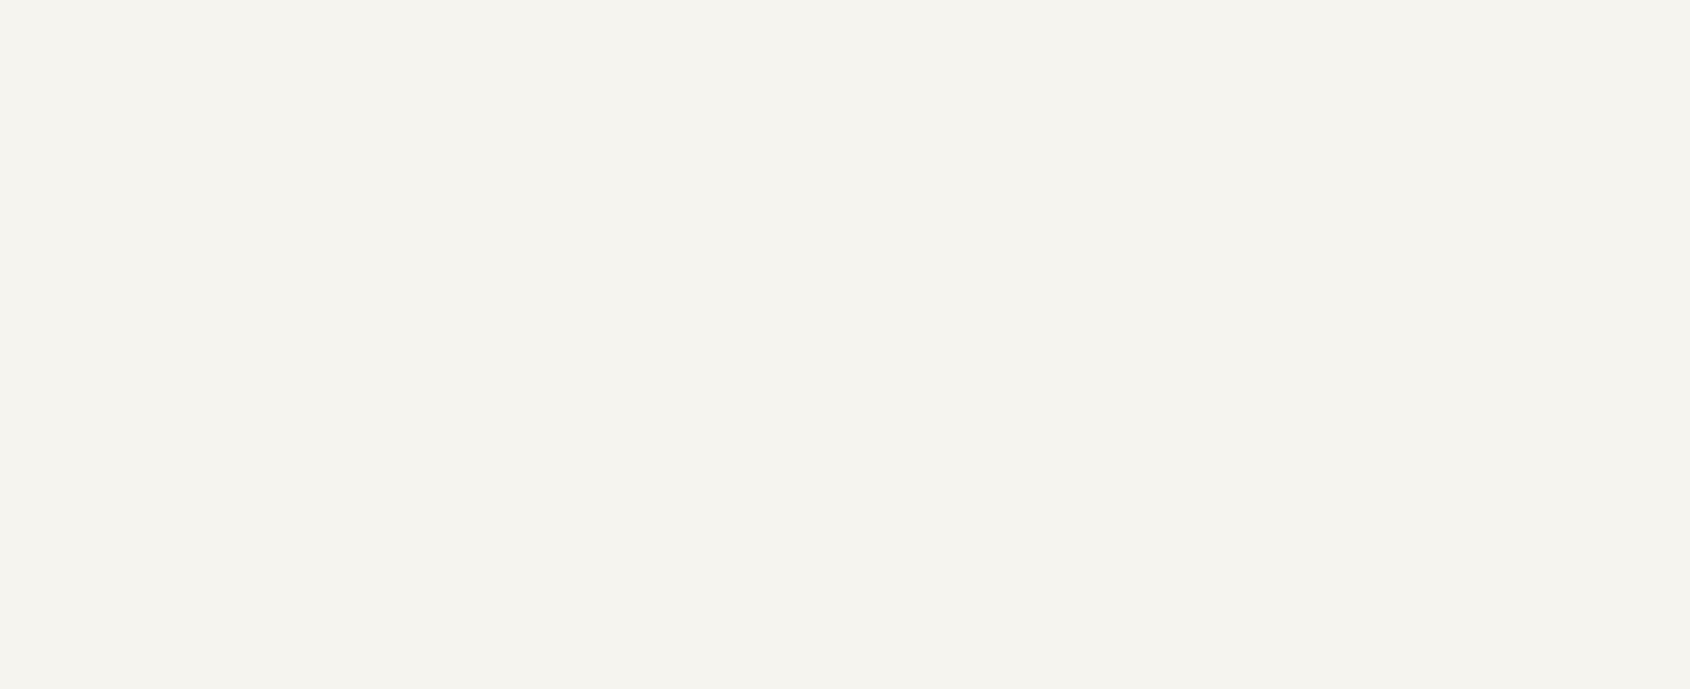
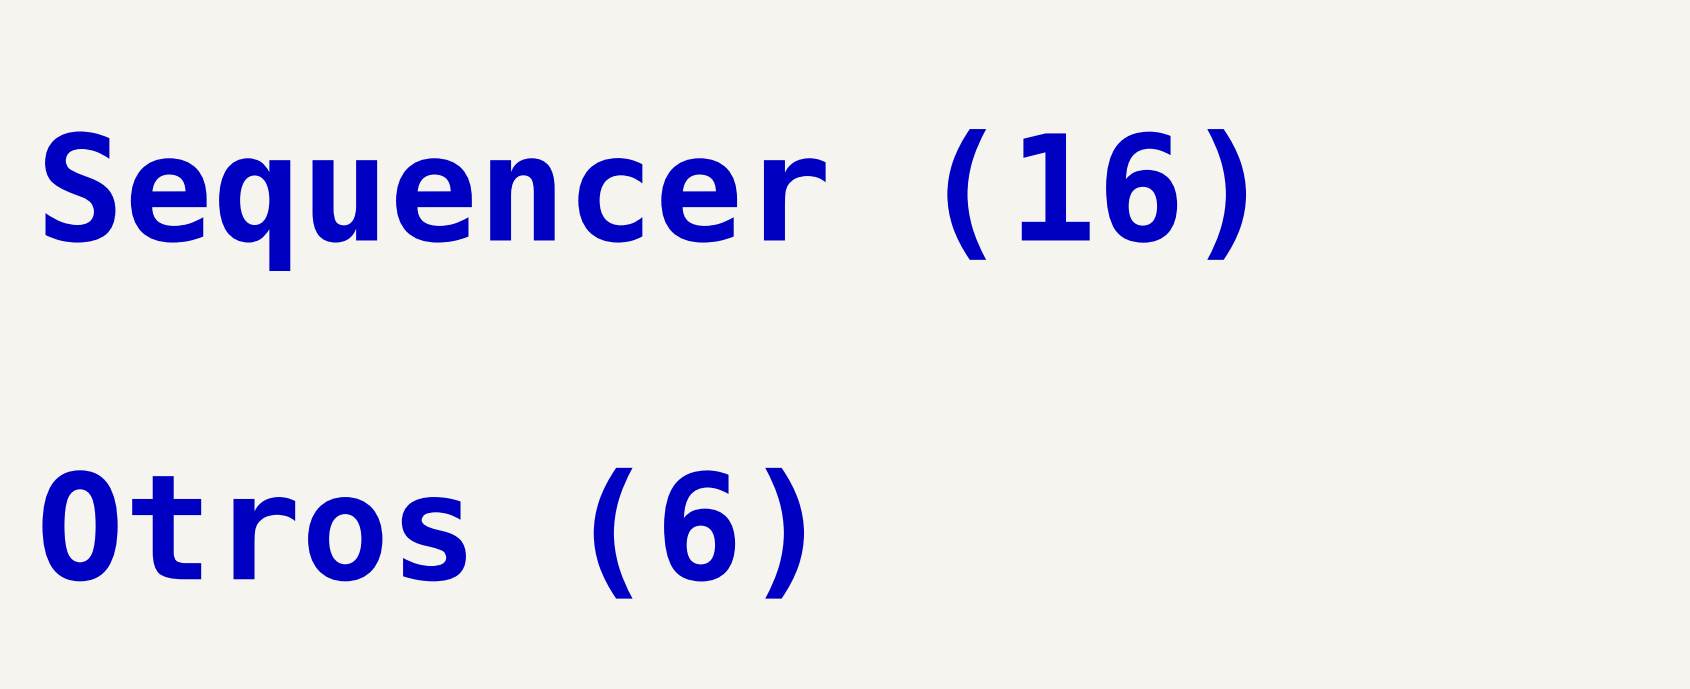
text: none -> Sequencer (16) (645, 200)
text: none -> Otros (6) (423, 533)

